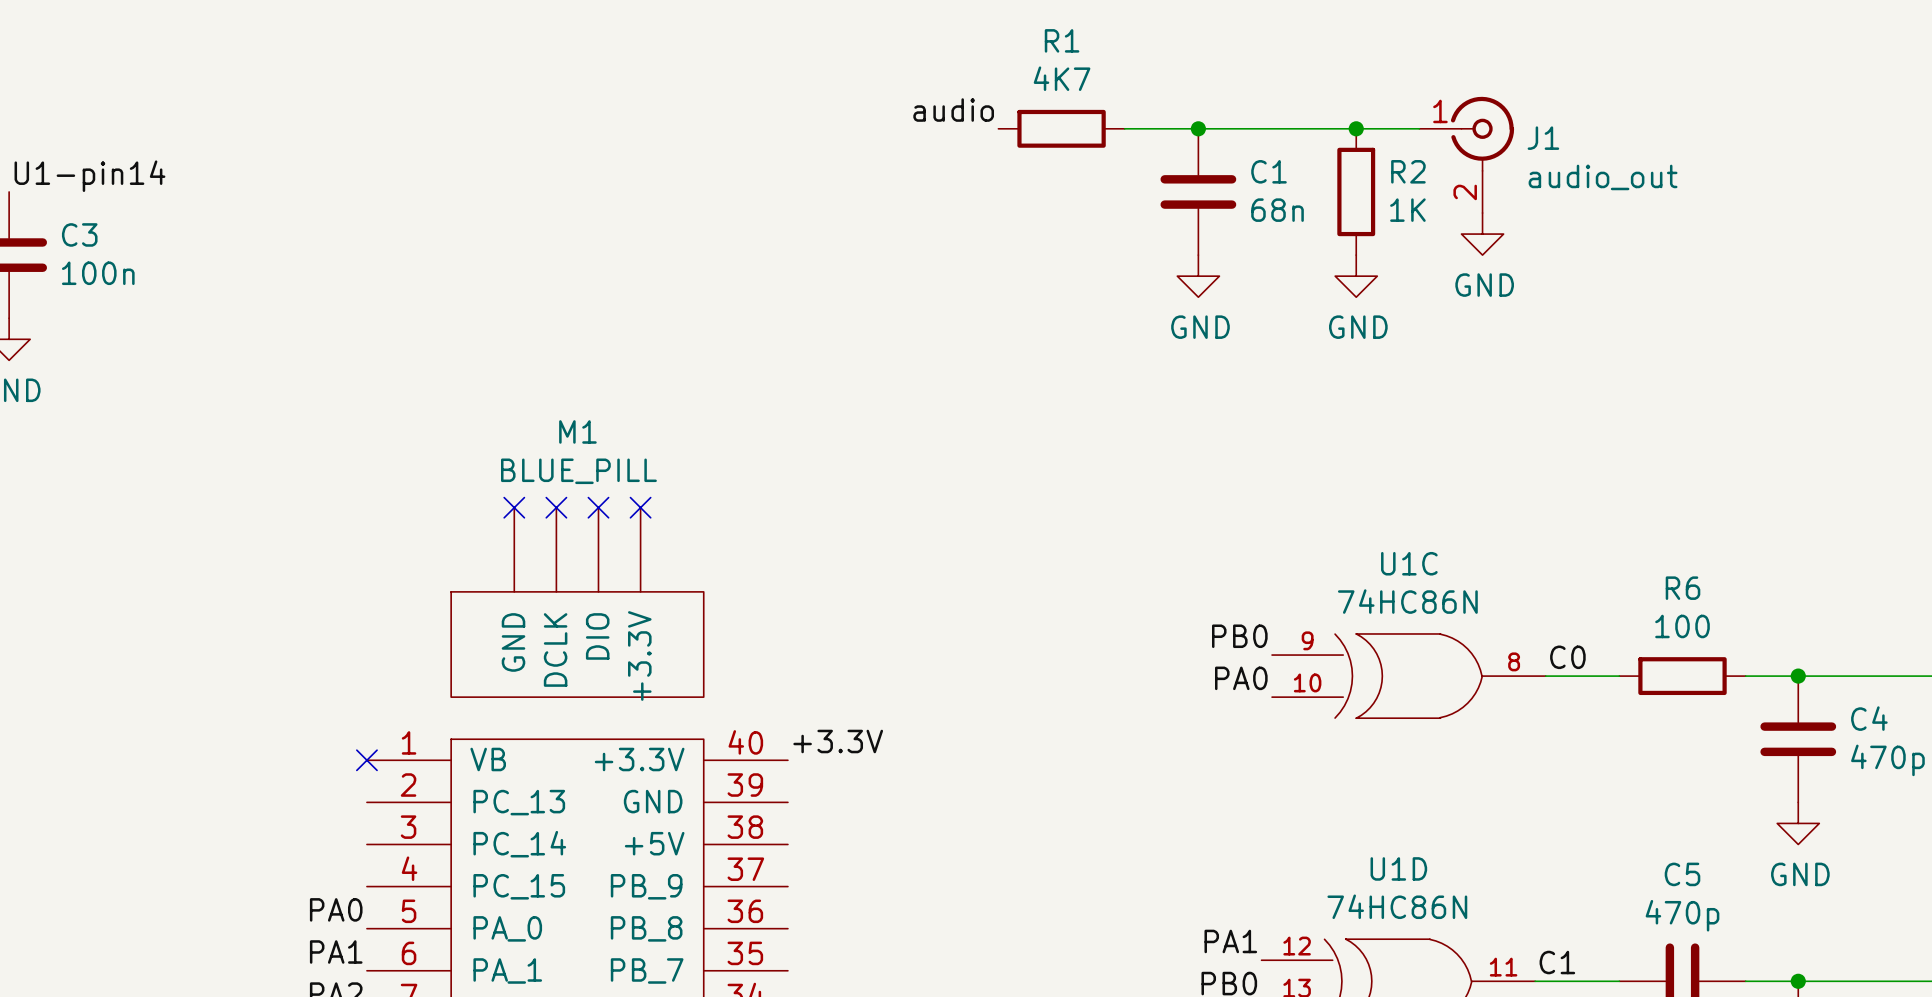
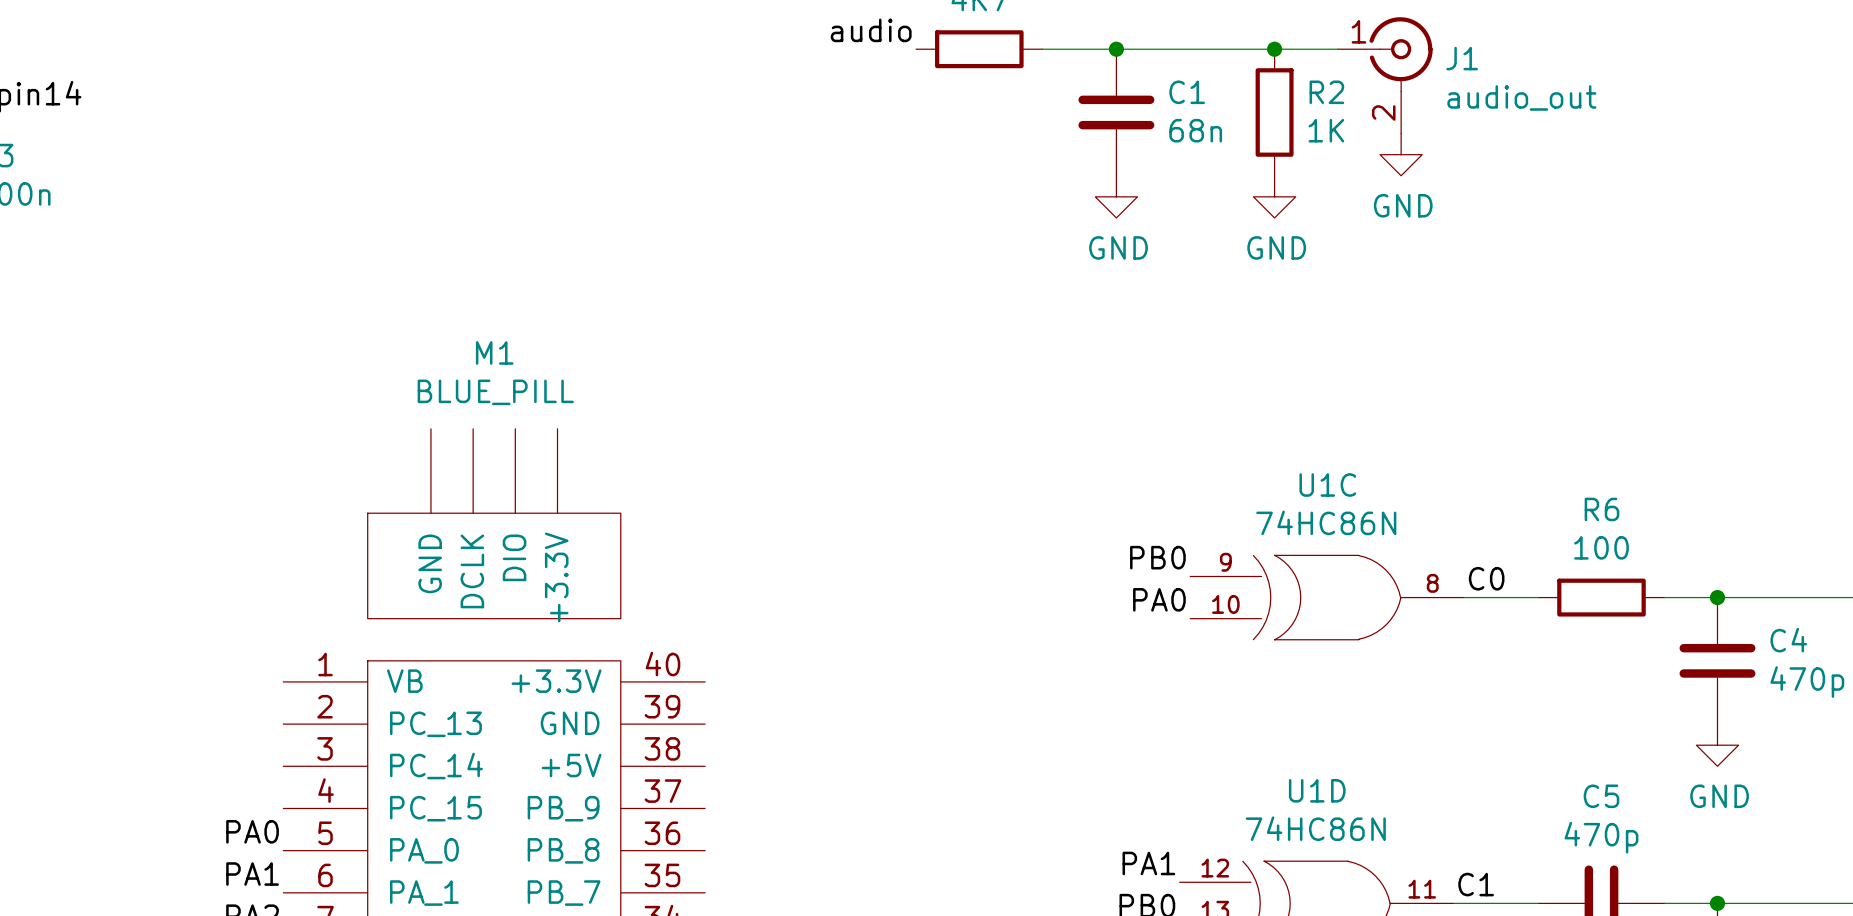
no-connect mark: (514, 507) -> none
no-connect mark: (556, 507) -> none
no-connect mark: (598, 507) -> none
no-connect mark: (640, 507) -> none
label: +3.3V (838, 741) -> none
no-connect mark: (366, 760) -> none

